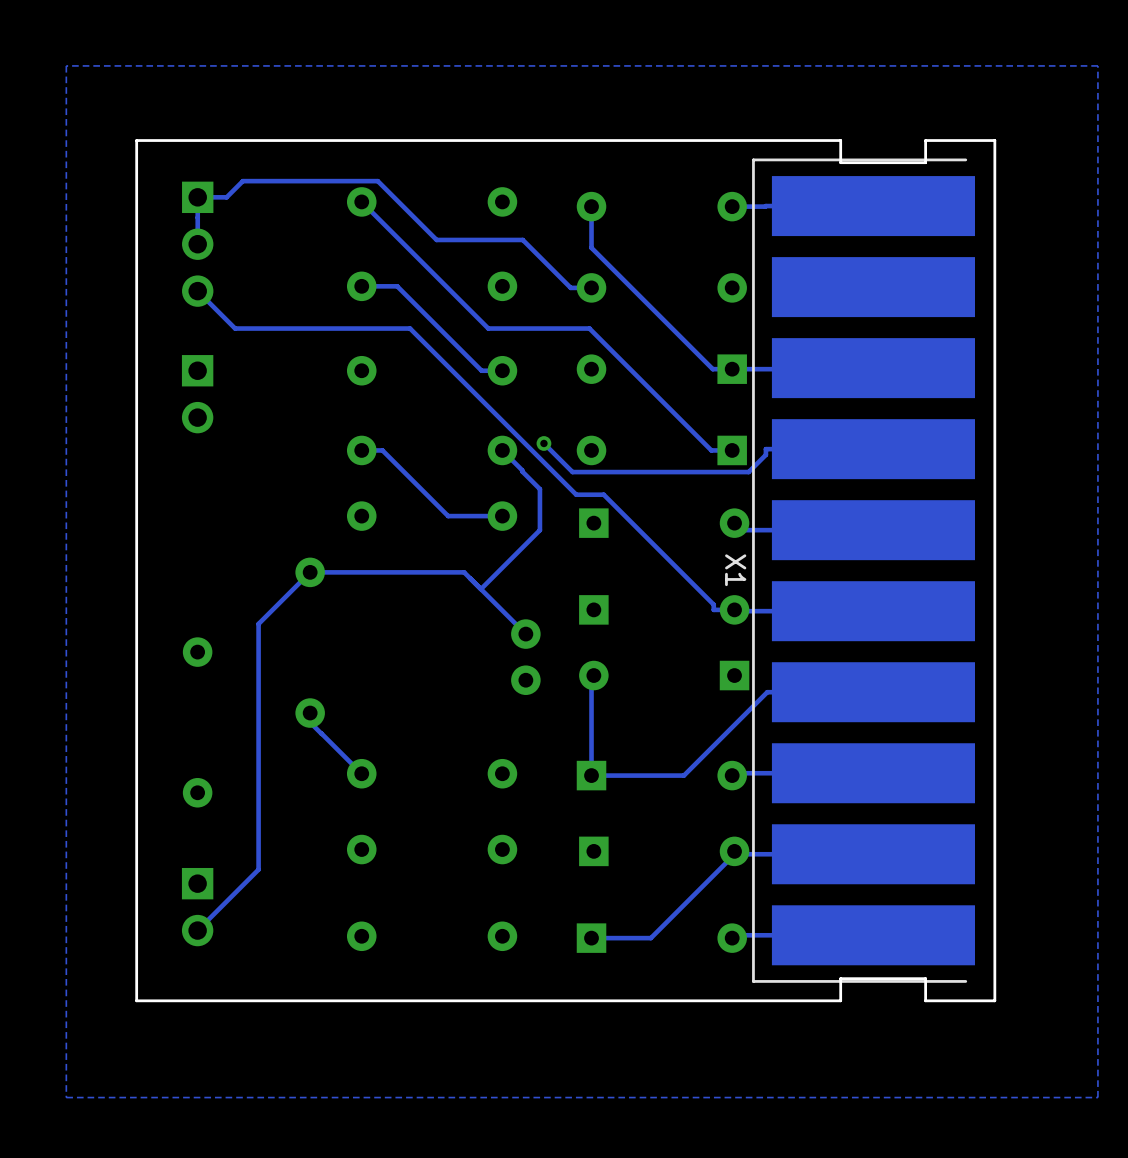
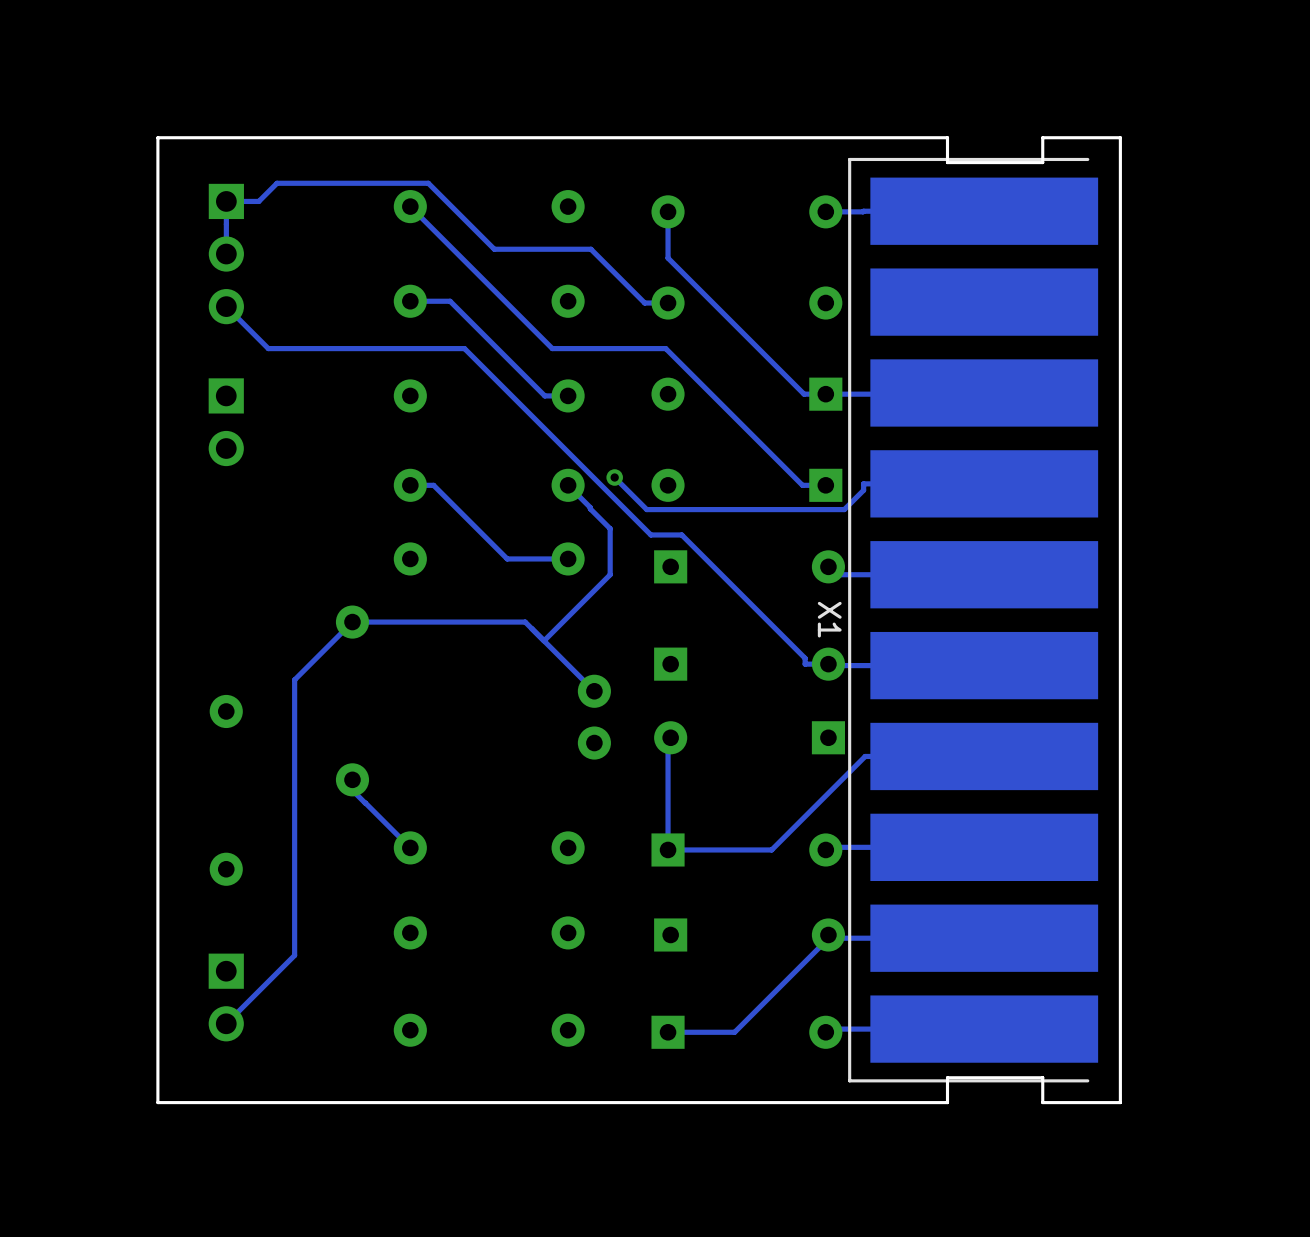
zone outline: (1097, 65) (66, 65) (66, 1097) (1097, 1097) (1097, 65) -> none

